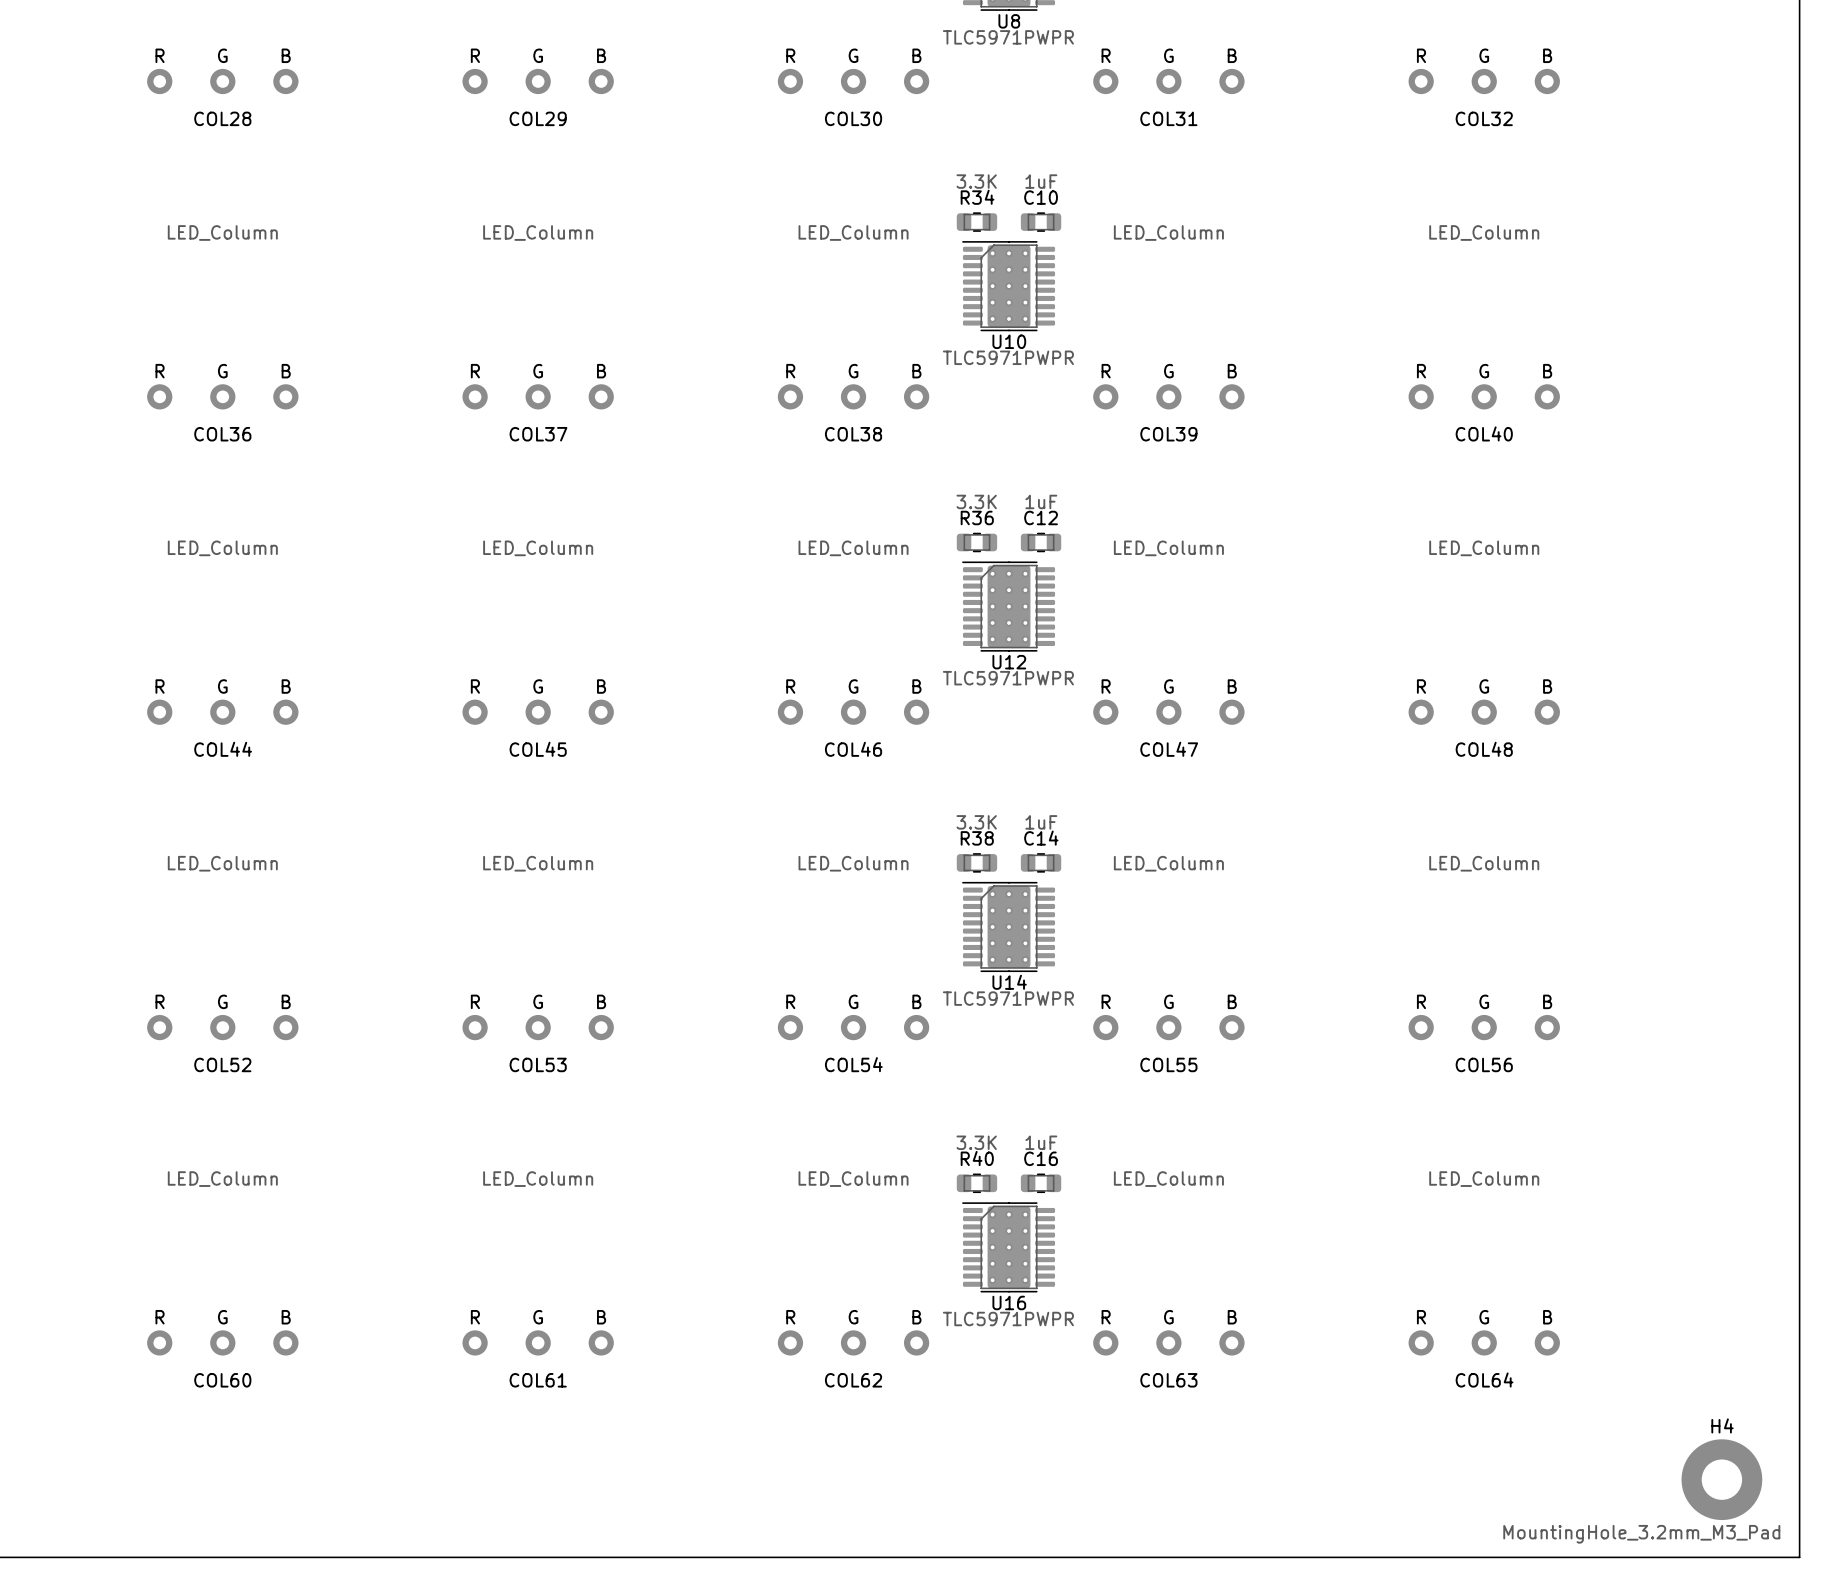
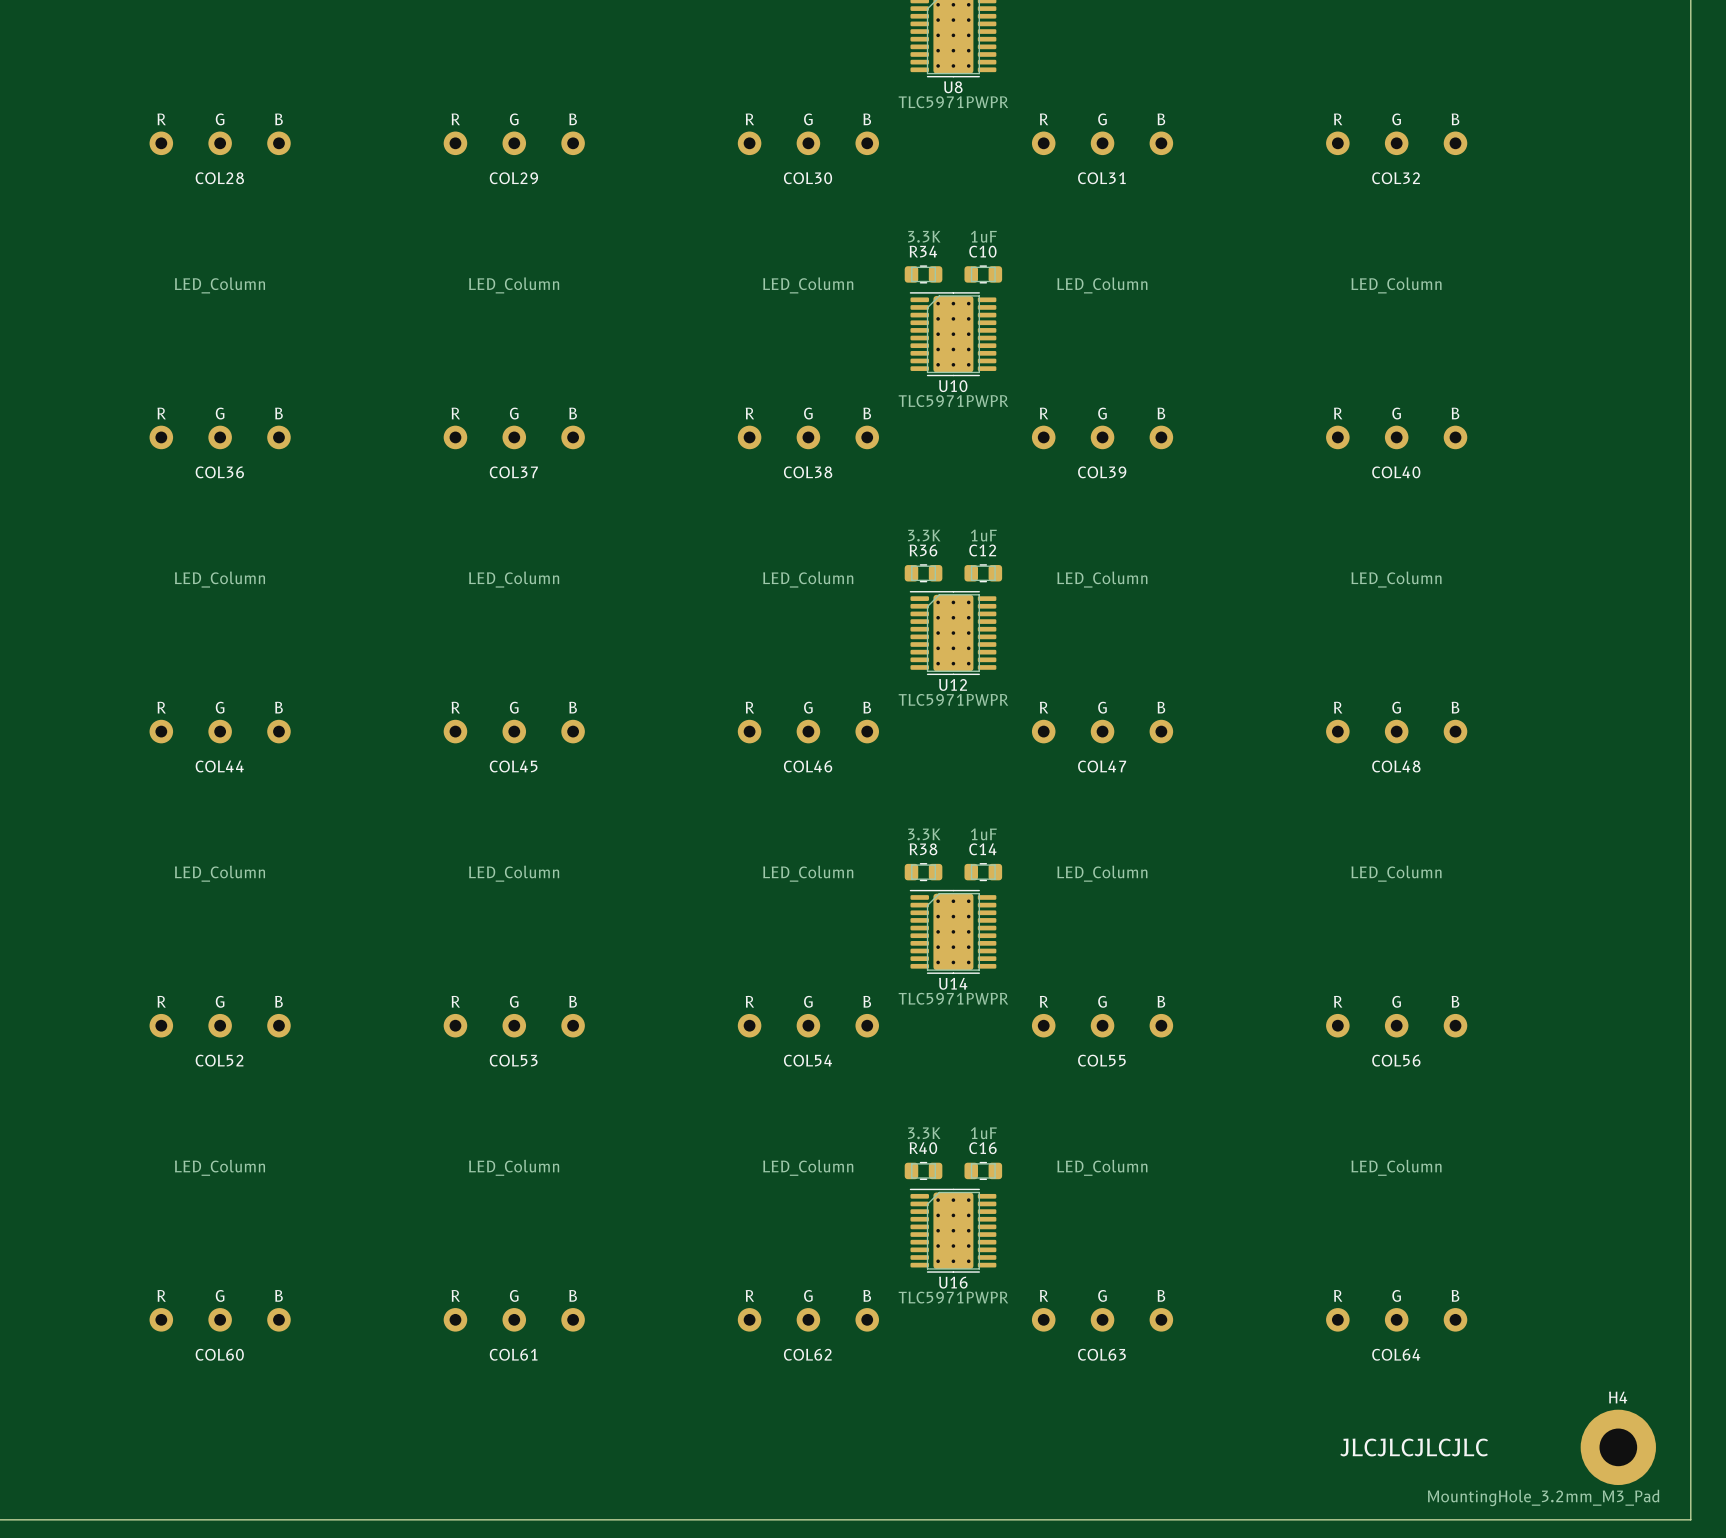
text: none -> JLCJLCJLCJLC (1414, 1447)

